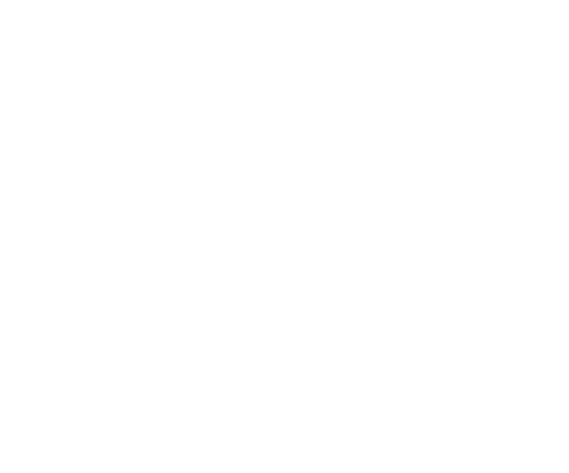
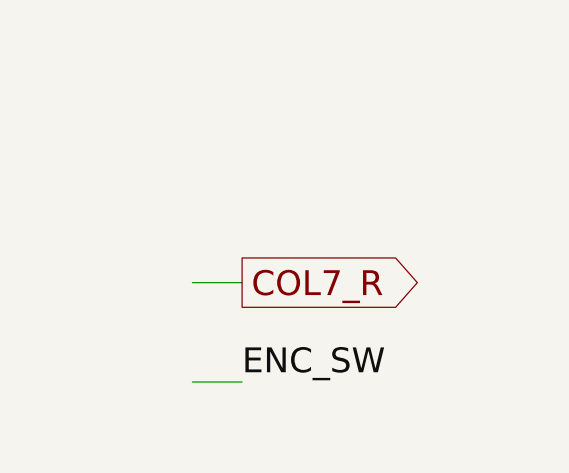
wire: none -> (192, 282) (242, 282)
global label: none -> COL7_R (317, 286)
label: none -> ENC_SW (314, 363)
wire: none -> (192, 381) (242, 381)

